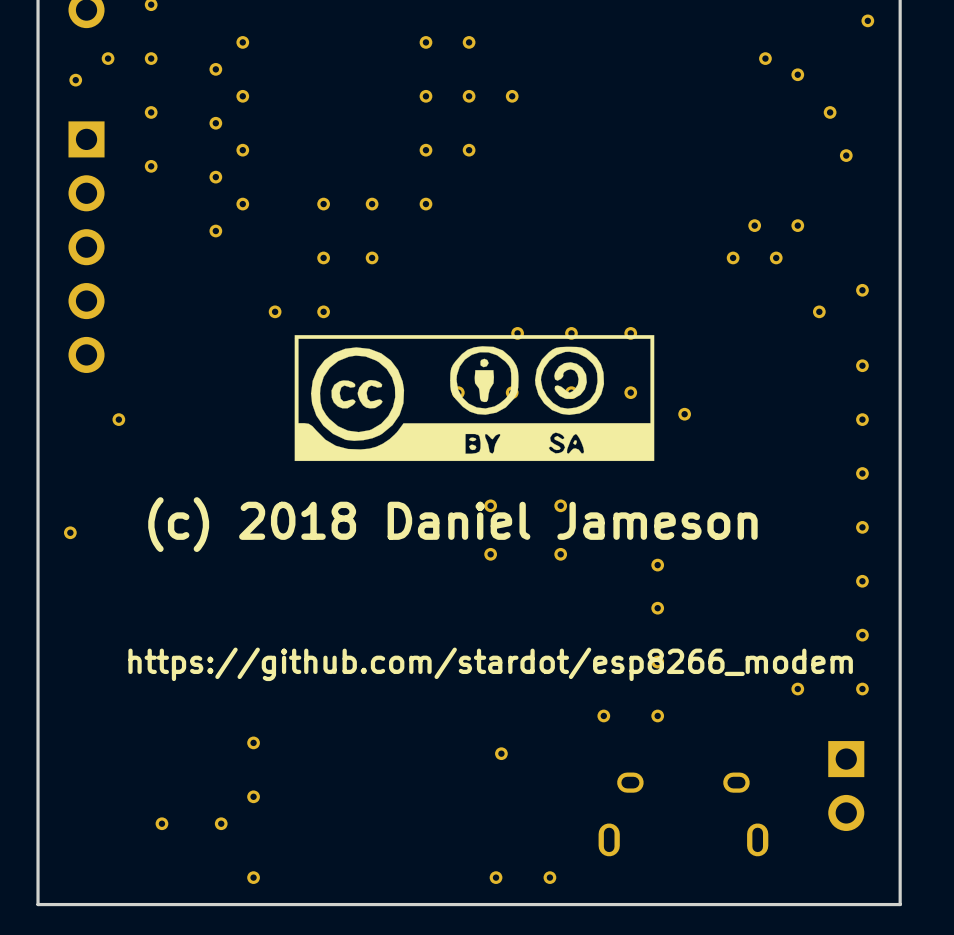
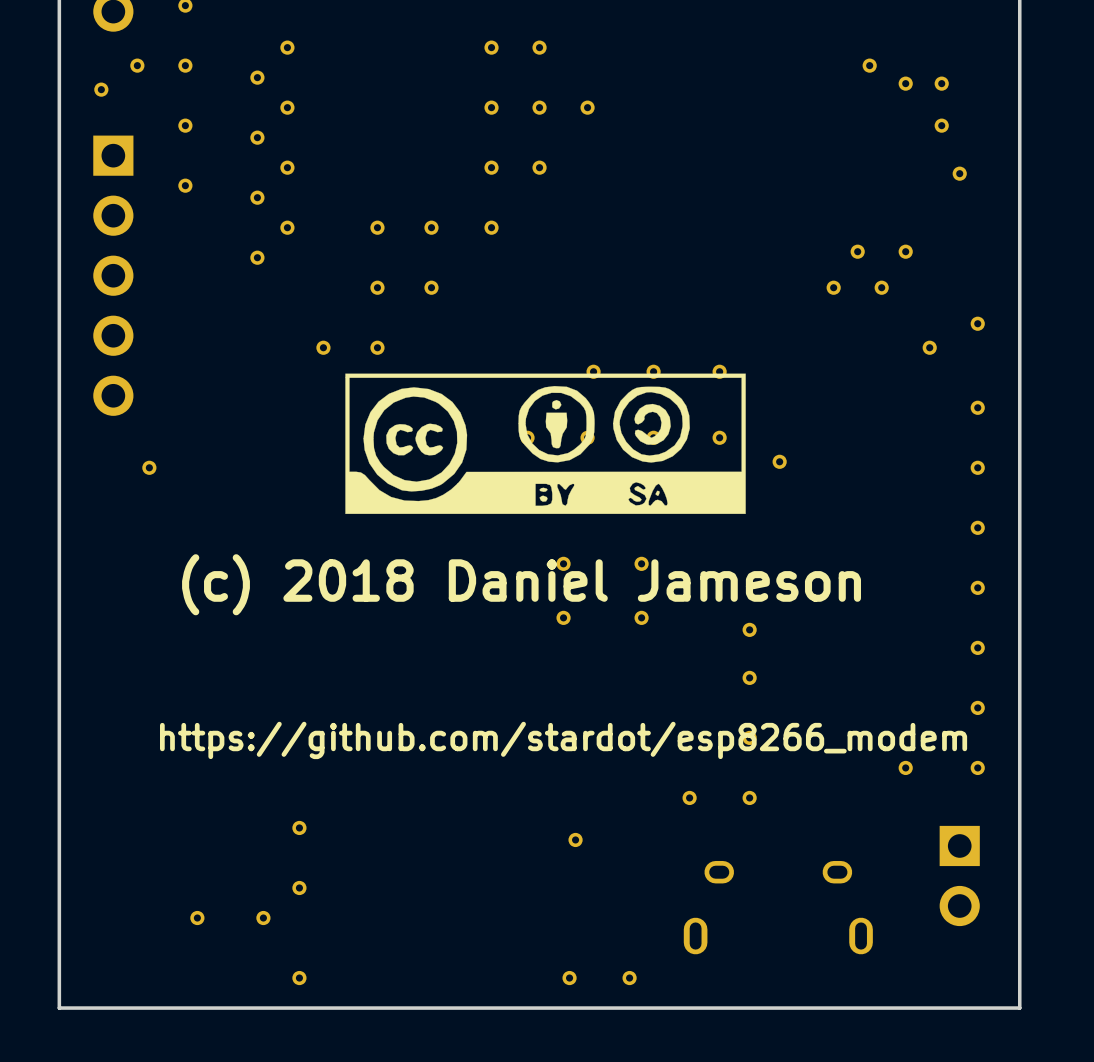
part position: (867, 20) -> (941, 83)
part: (70, 532) -> none

